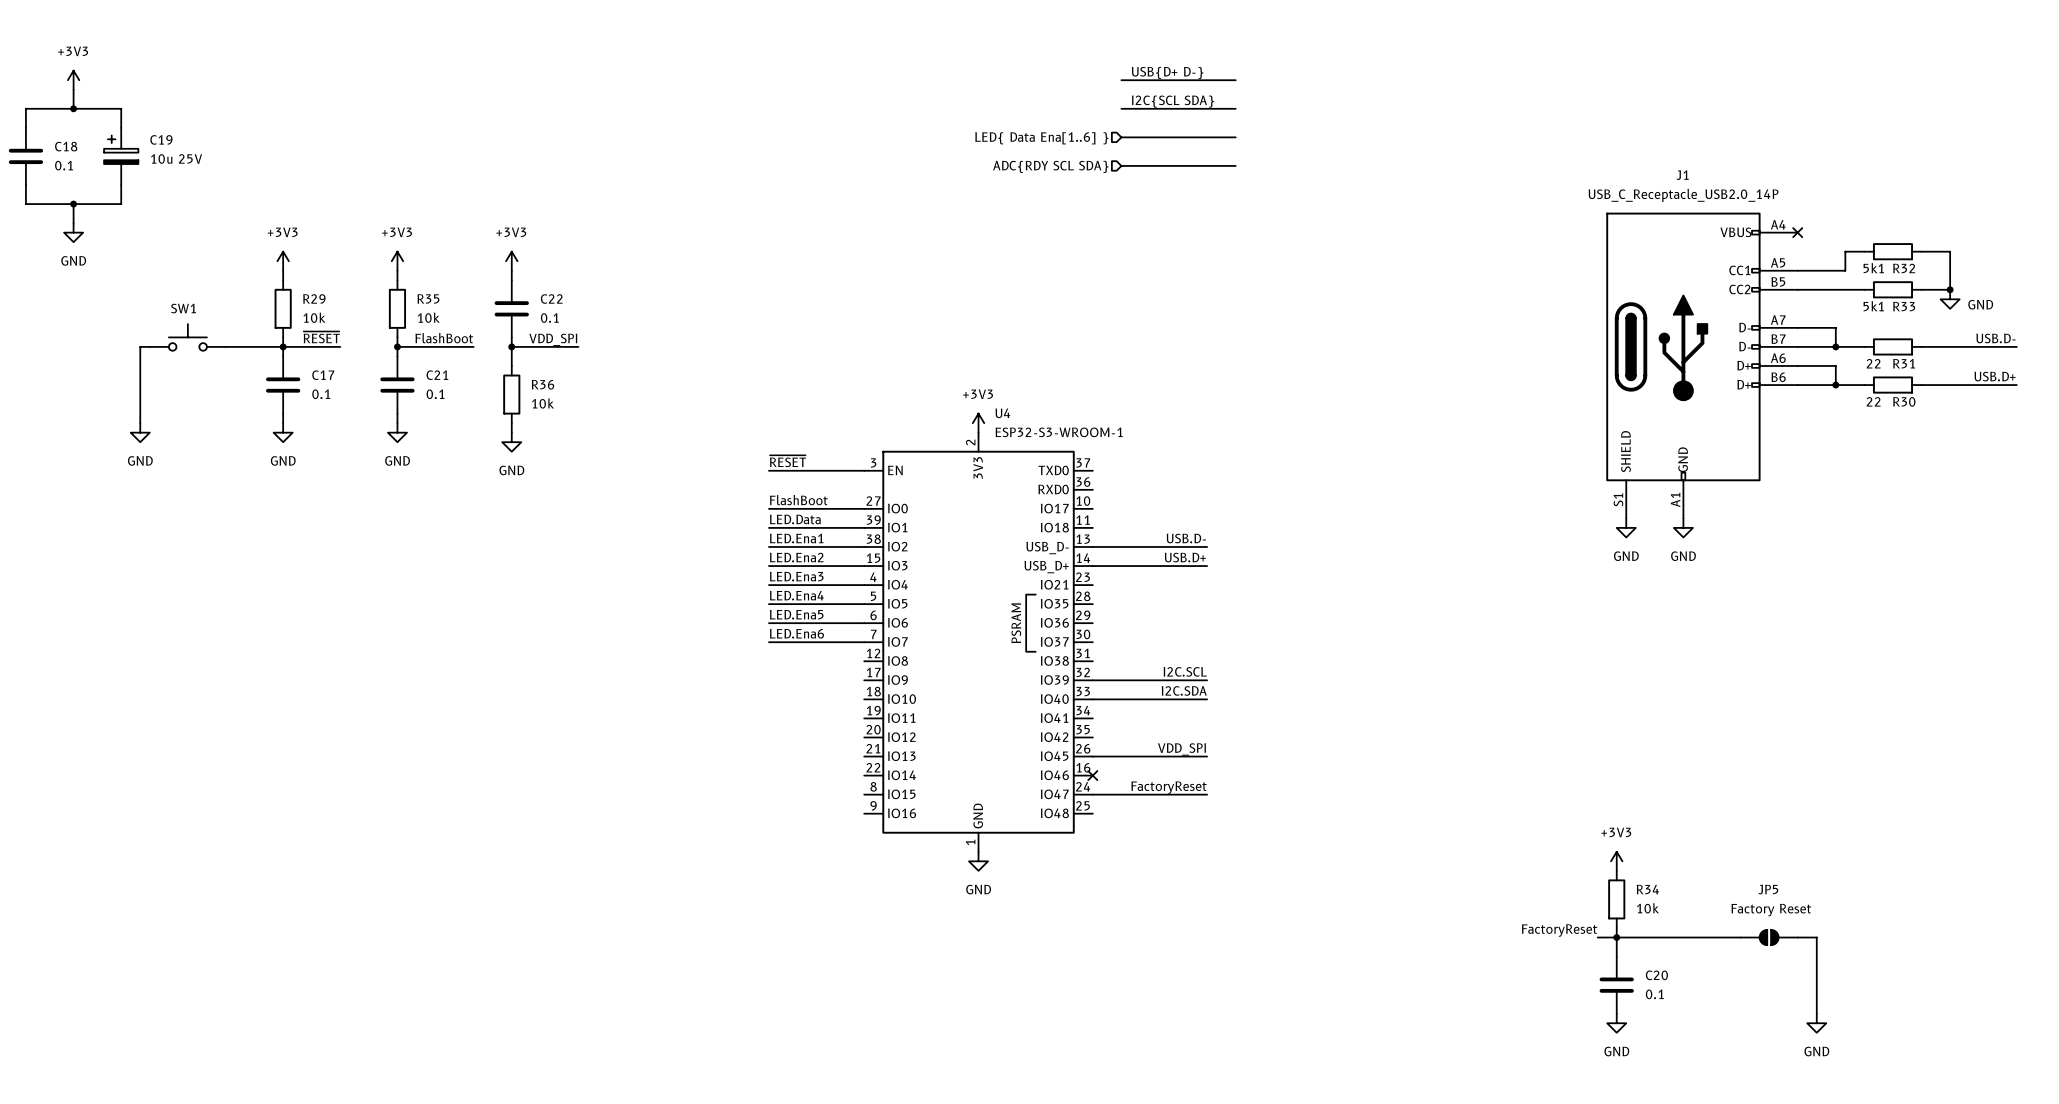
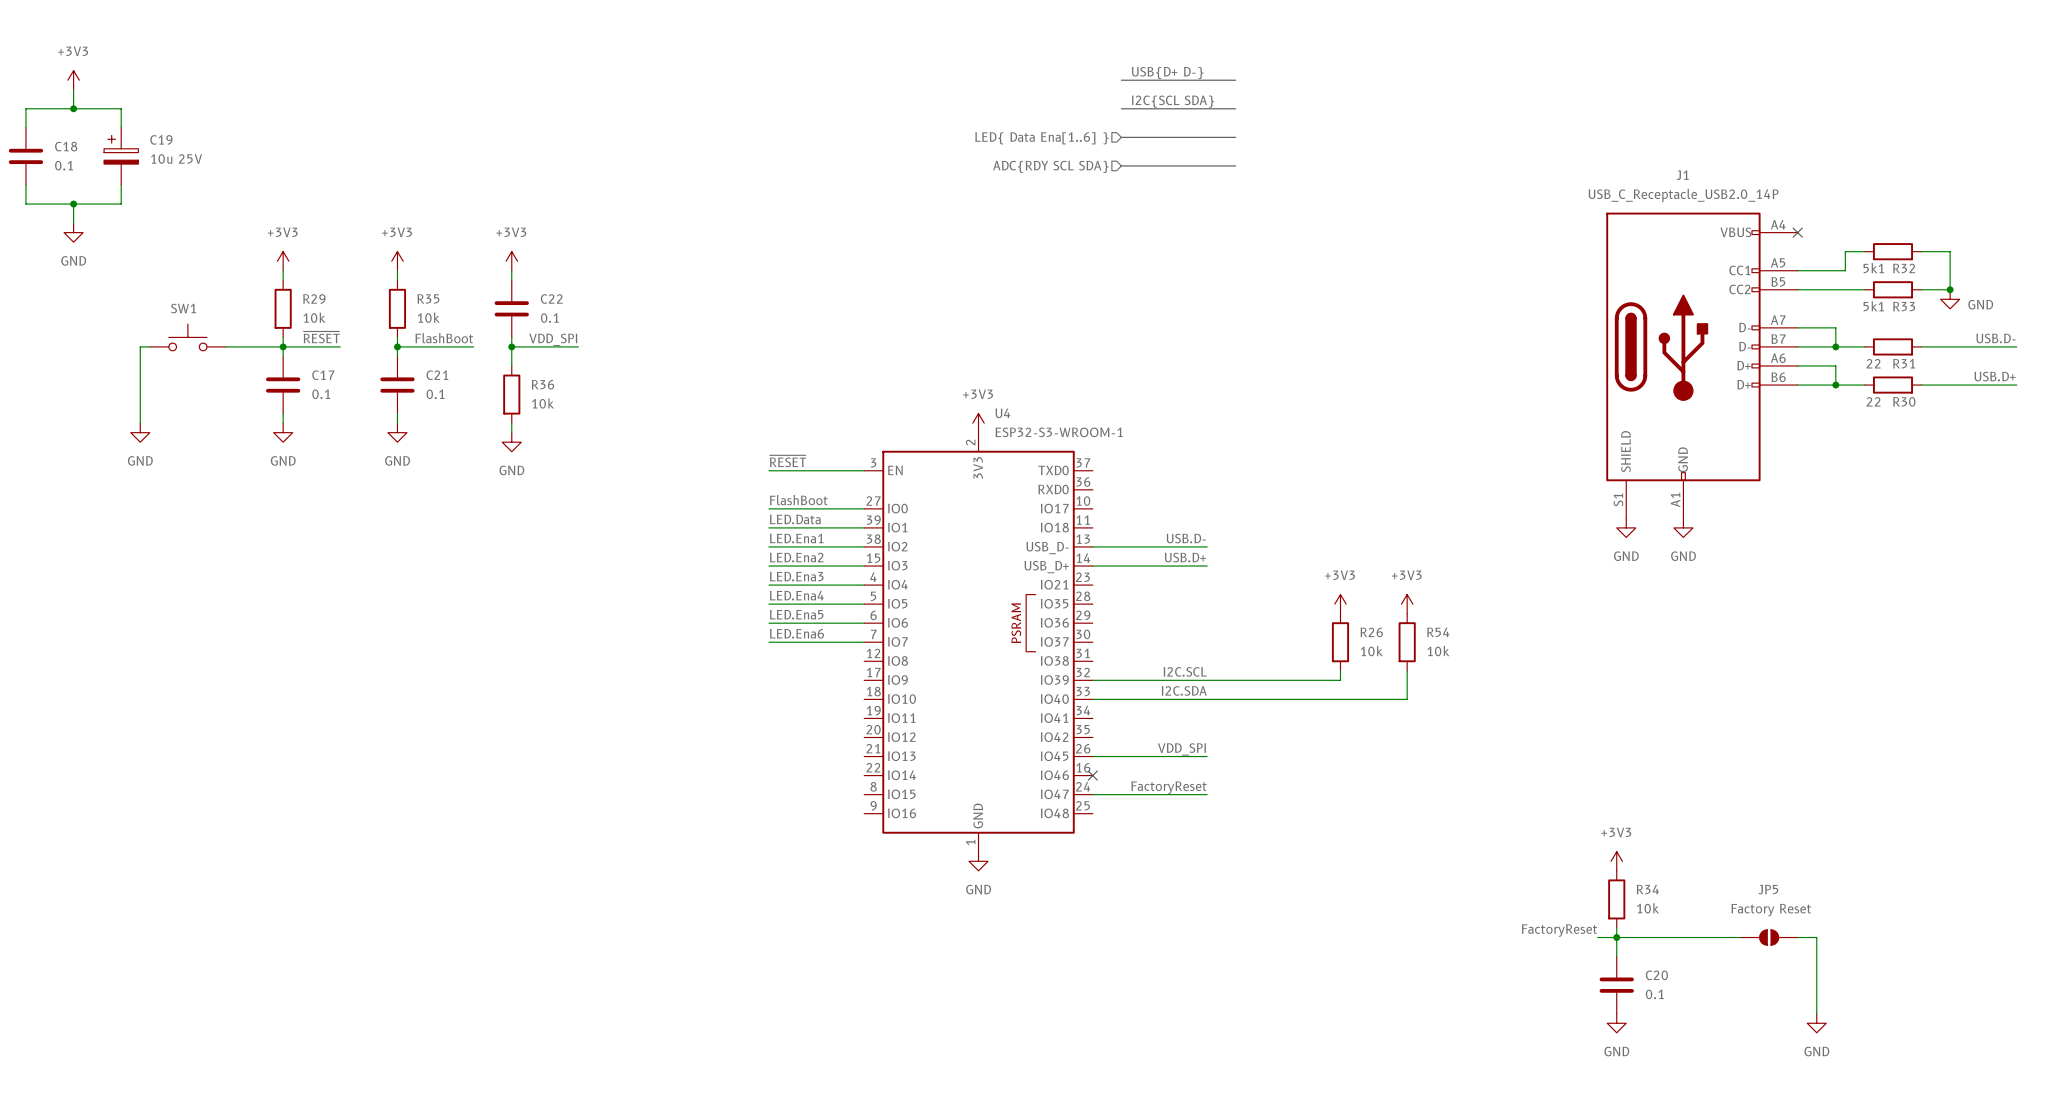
power symbol: none -> +3V3 (1340, 604)
power symbol: none -> +3V3 (1407, 604)
R26: none -> 10k (1340, 642)
R54: none -> 10k (1407, 642)
wire: none -> (1340, 670) (1340, 680) (1207, 680)
wire: none -> (1407, 670) (1407, 699) (1207, 699)

